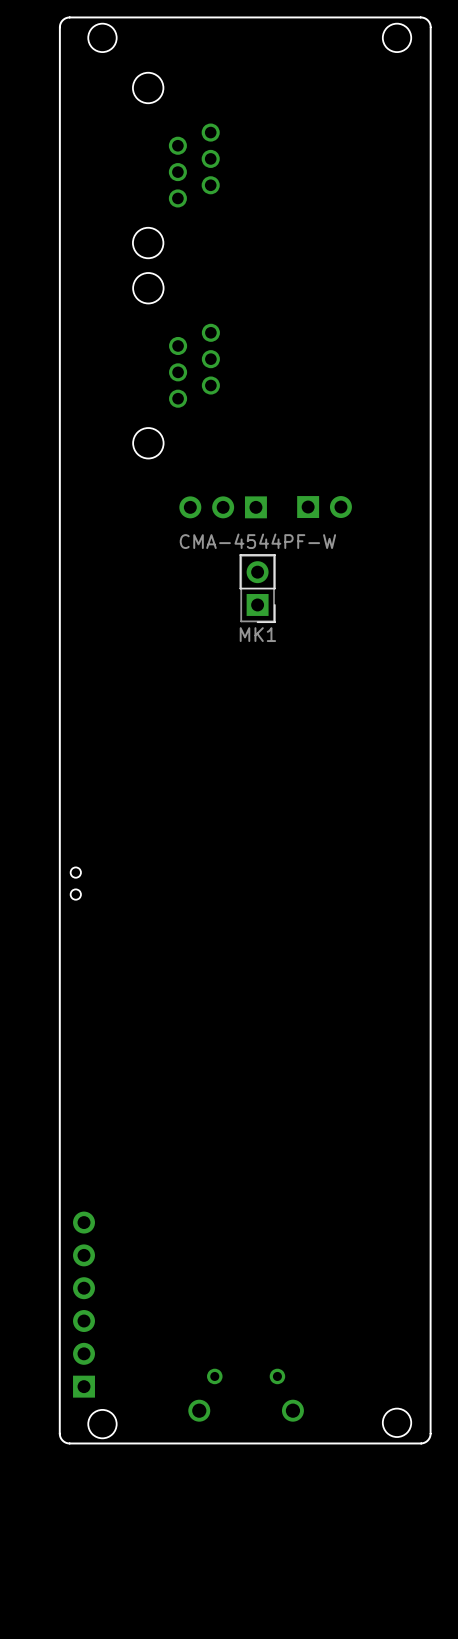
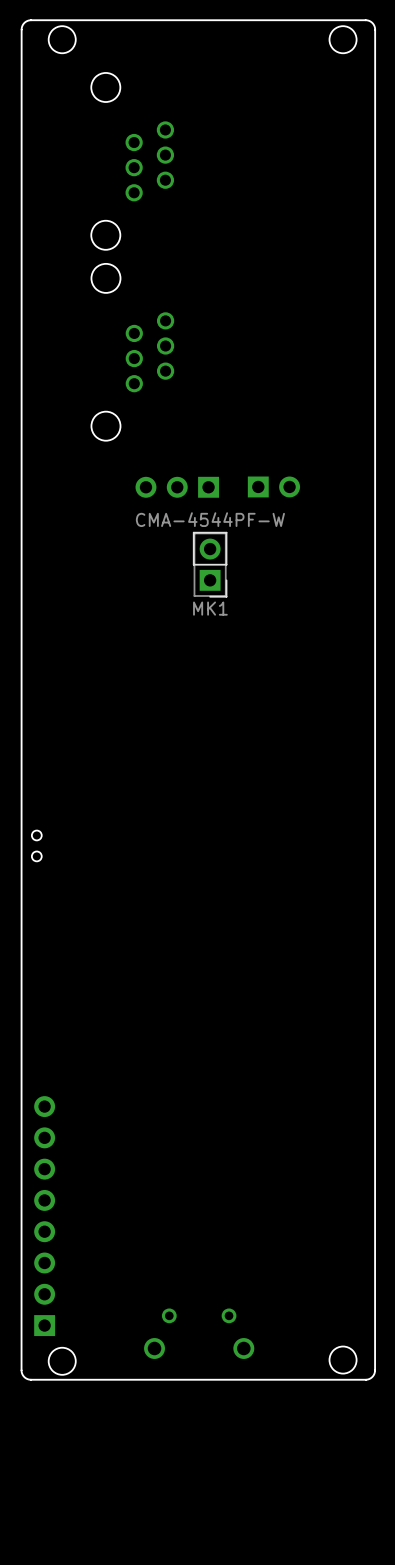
part: none -> (44, 1216)

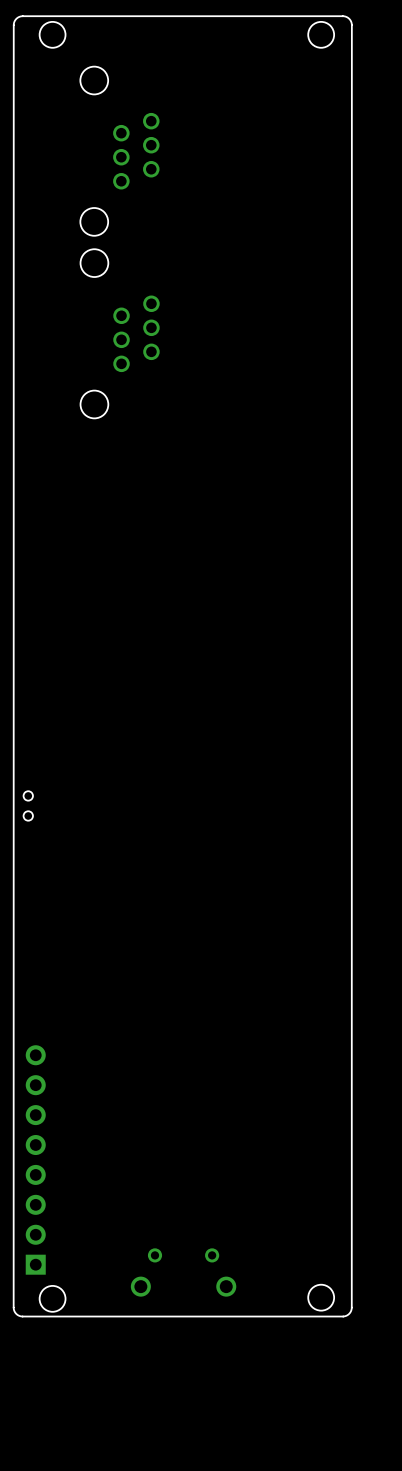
part: (273, 486) -> none
part: (177, 487) -> none
MK1: CMA-4544PF-W (210, 564) -> none

